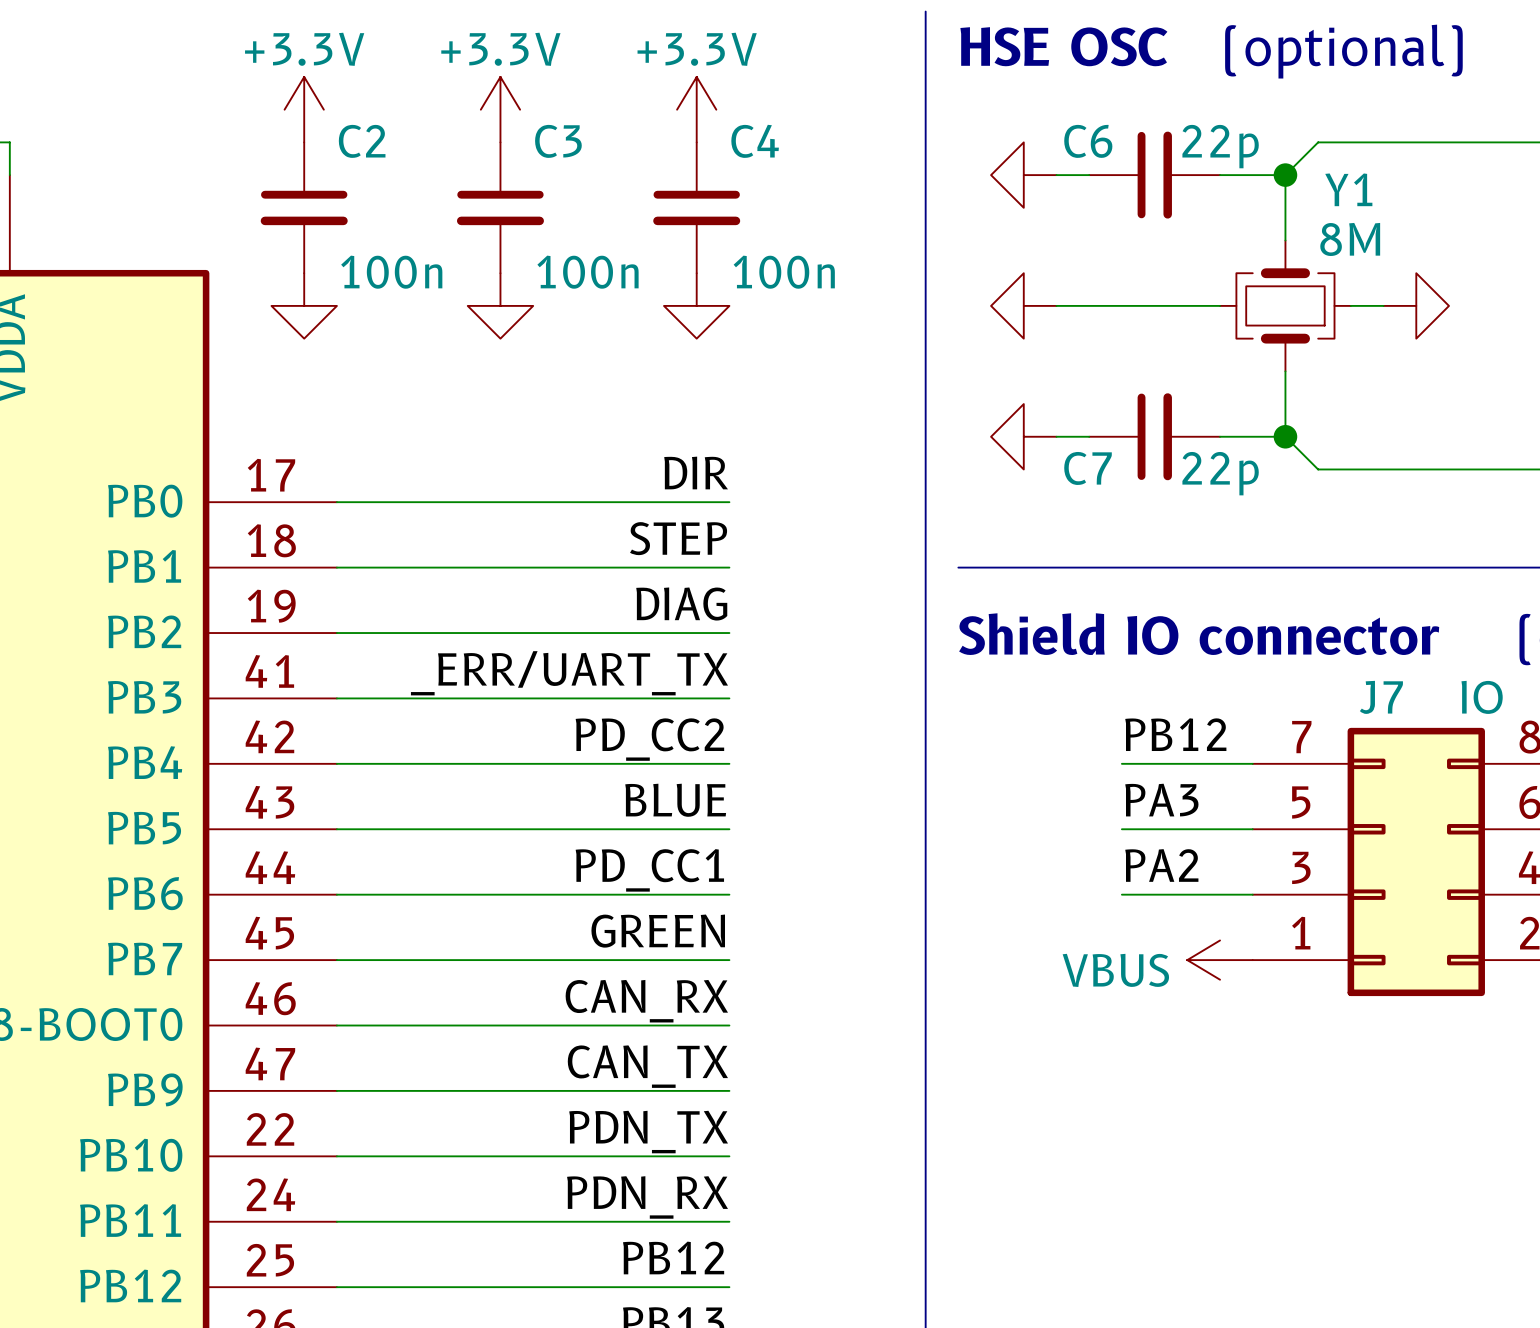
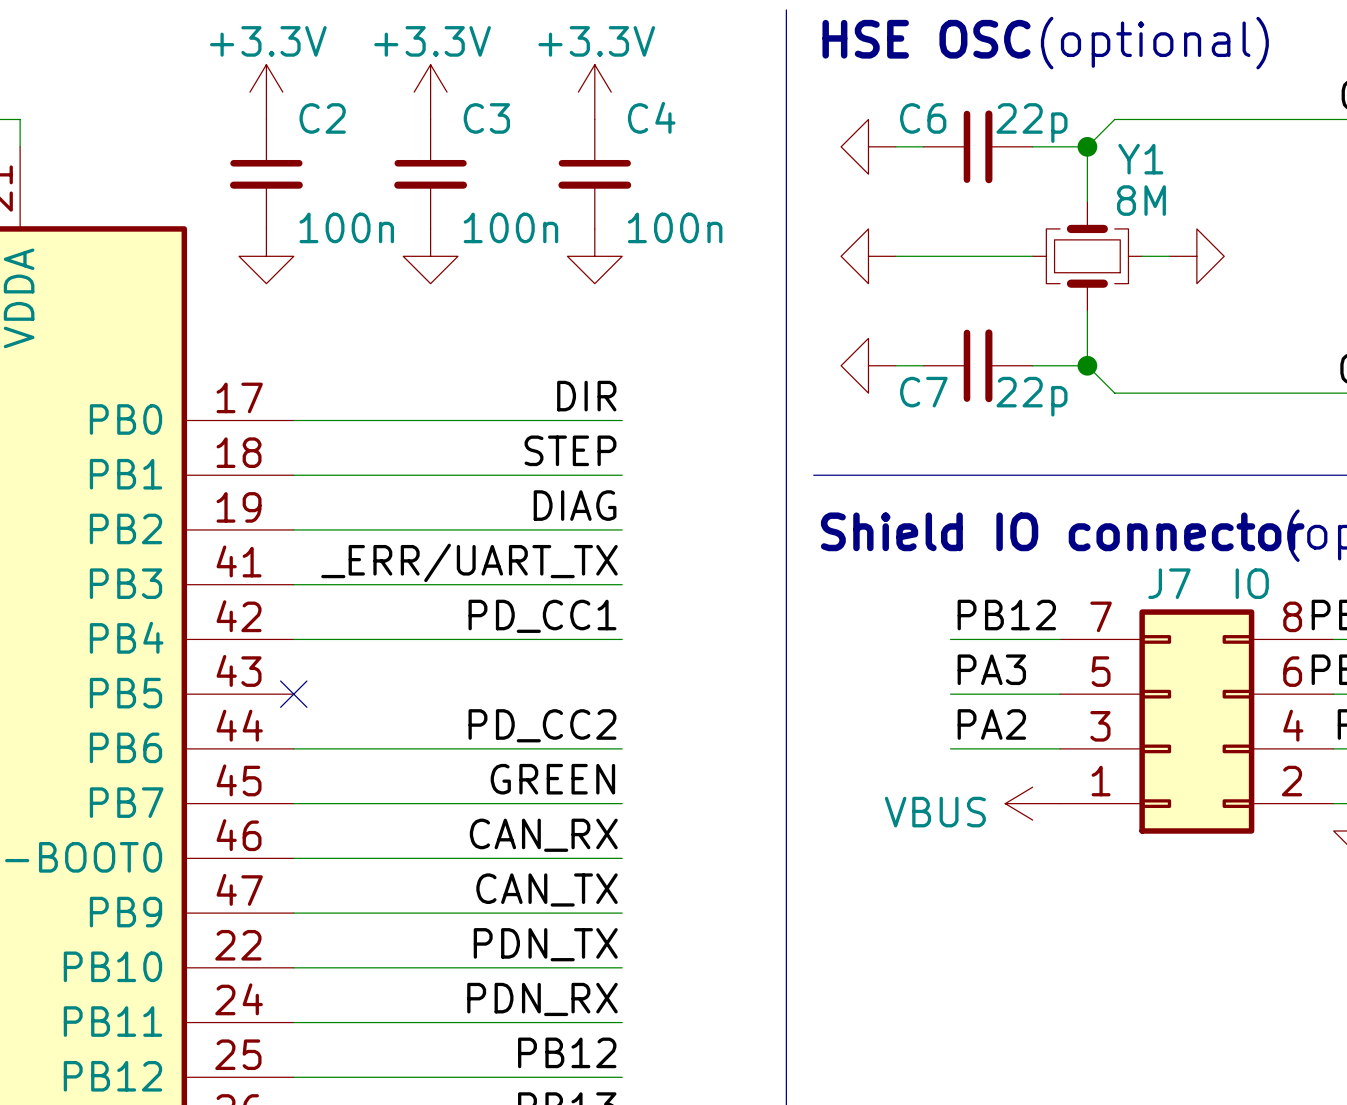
label: PD_CC2 (649, 739) -> PD_CC1 (542, 616)
label: BLUE (675, 800) -> none
wire: (336, 829) (729, 829) -> none
no-connect mark: none -> (293, 694)
label: PD_CC1 (649, 870) -> PD_CC2 (542, 725)

